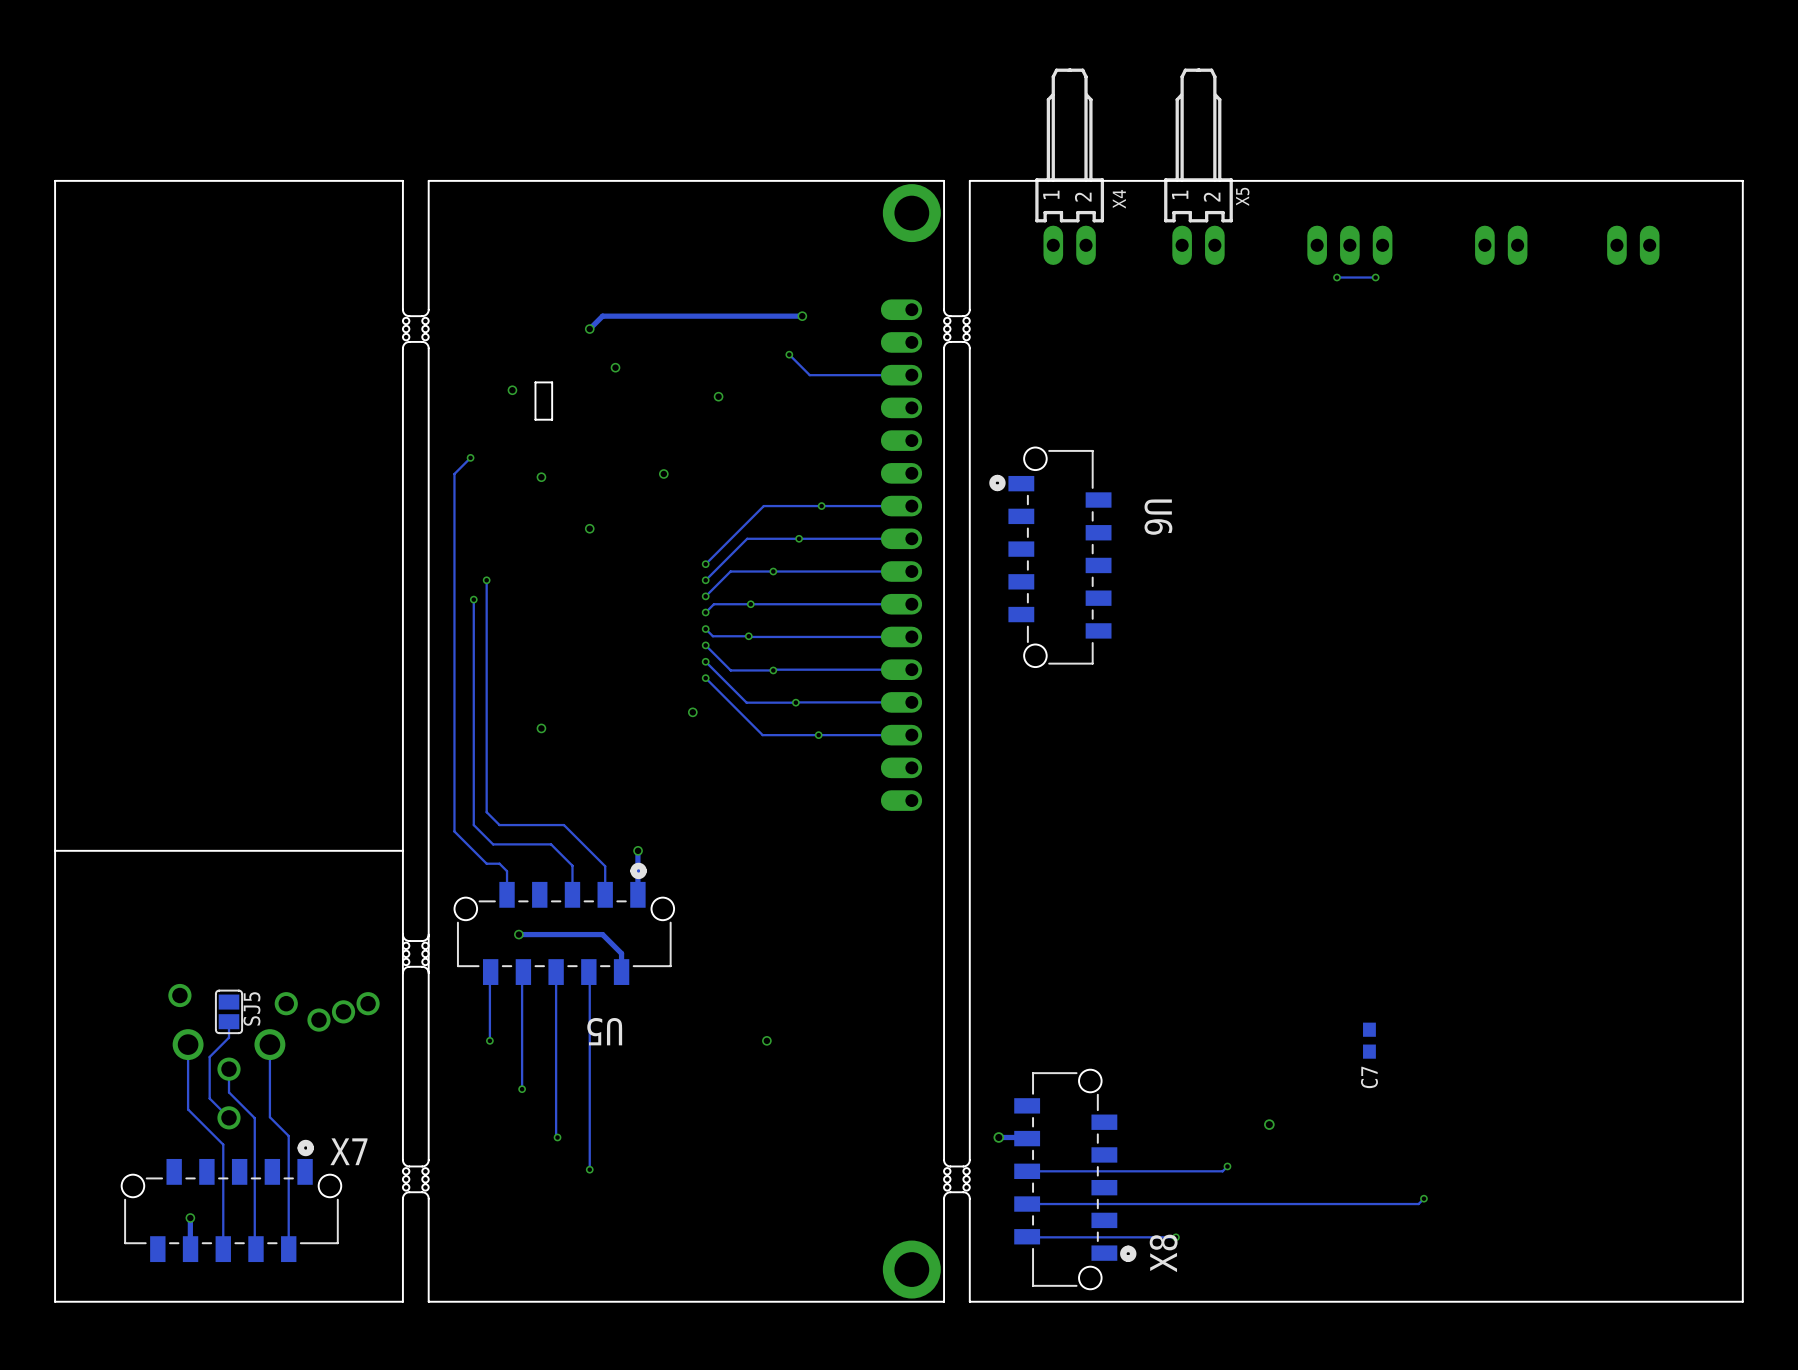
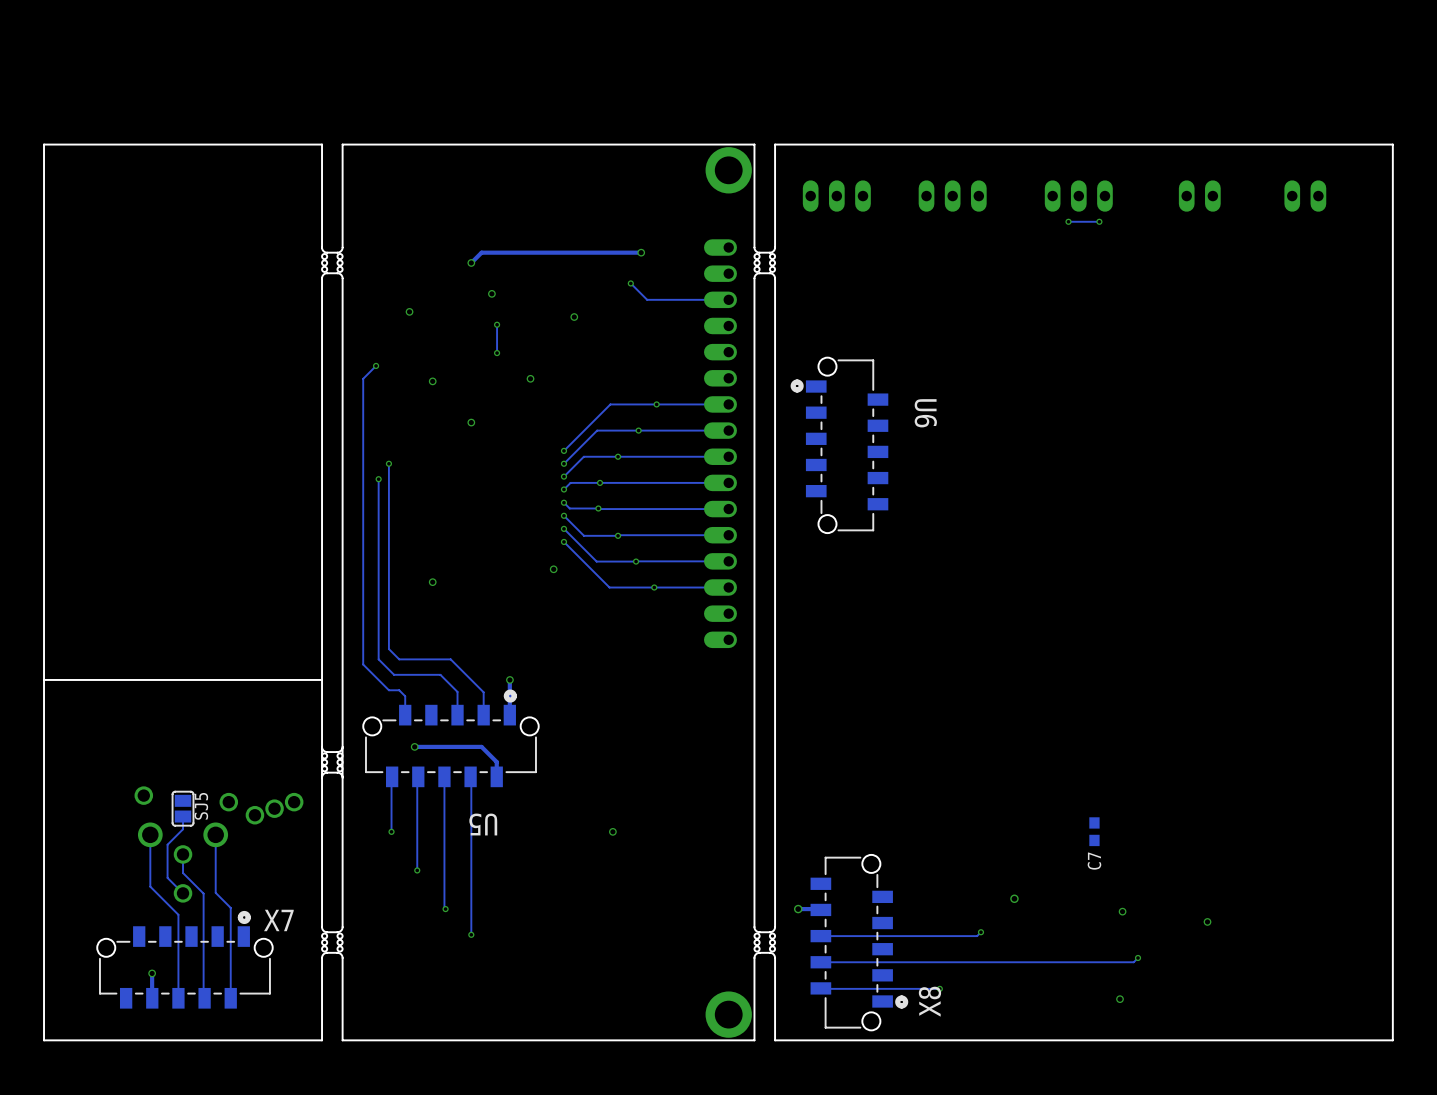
X4: (1069, 166) -> none
X5: (1198, 166) -> none
part: none -> (836, 196)
part: none -> (952, 196)
part: (543, 401) -> none
track: none -> (497, 324) (497, 353)
via: none -> (497, 324)
via: none -> (497, 353)
via: none -> (1122, 911)
via: none -> (1207, 921)
via: none -> (1119, 999)

